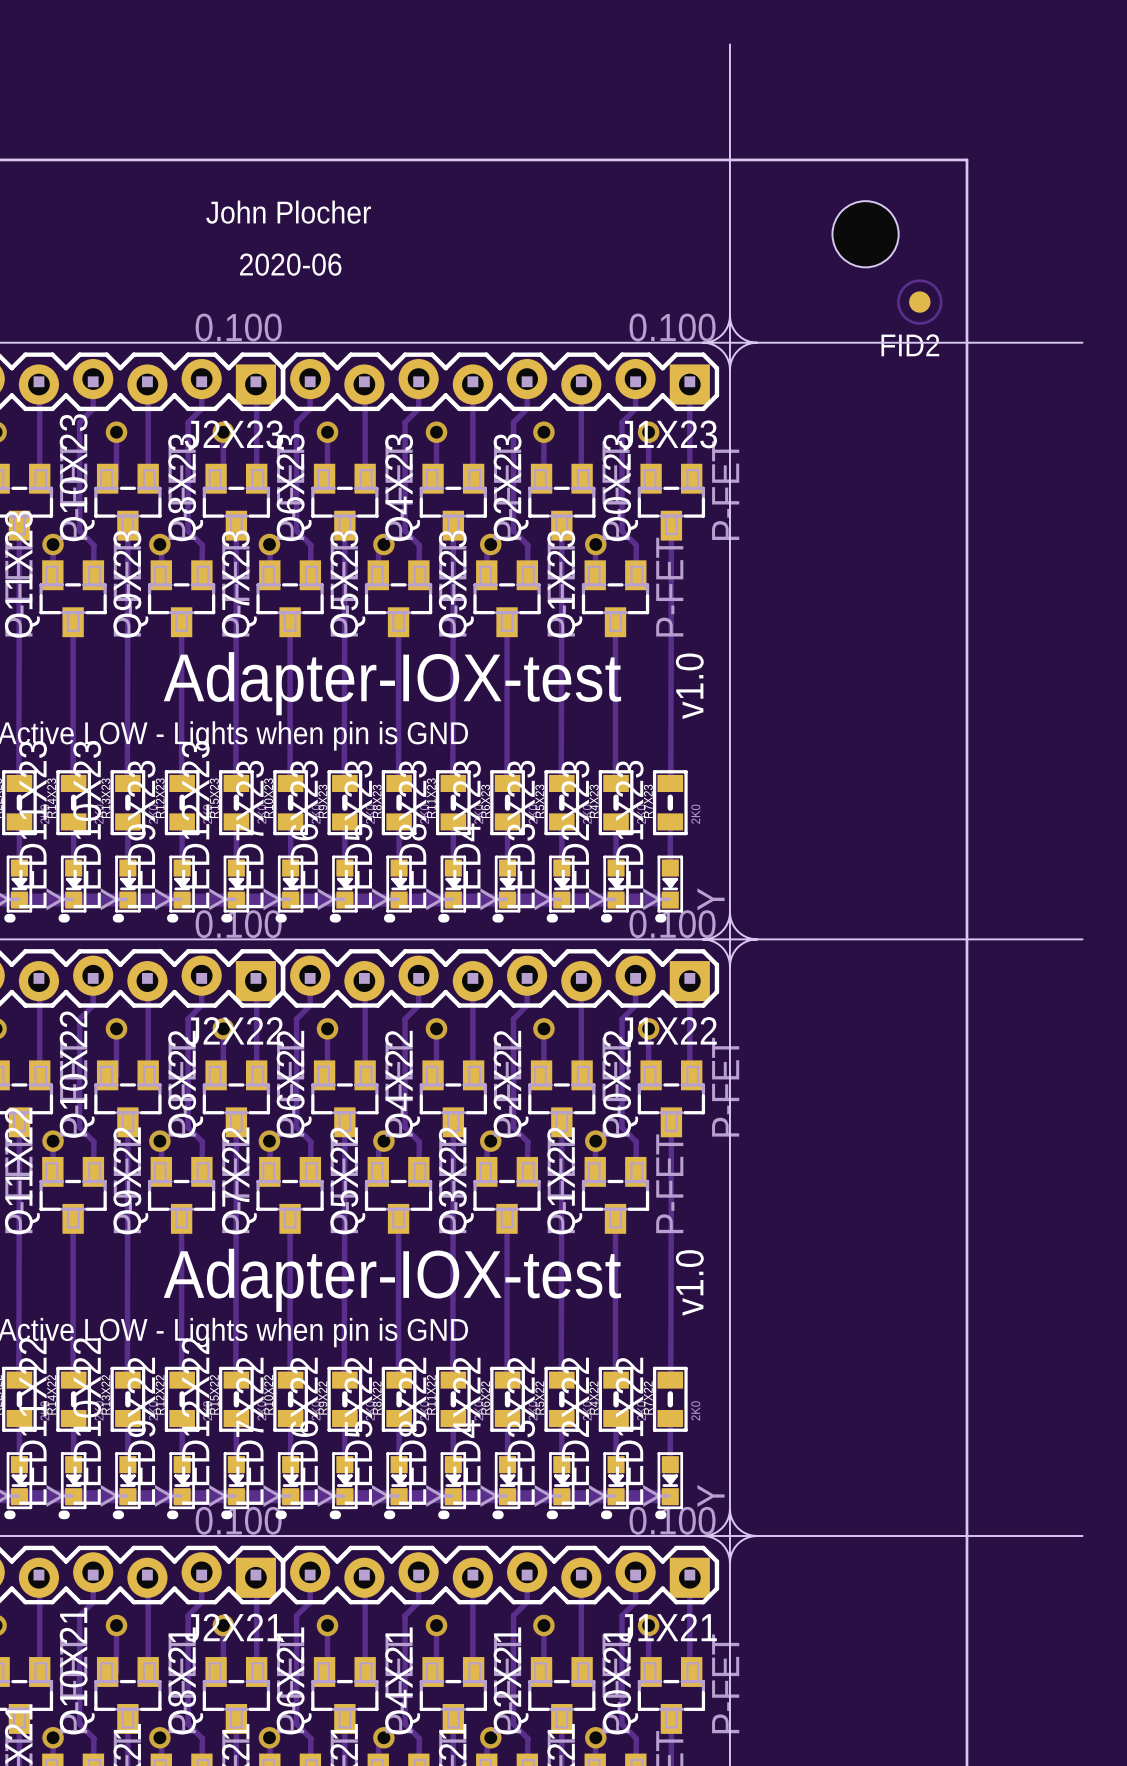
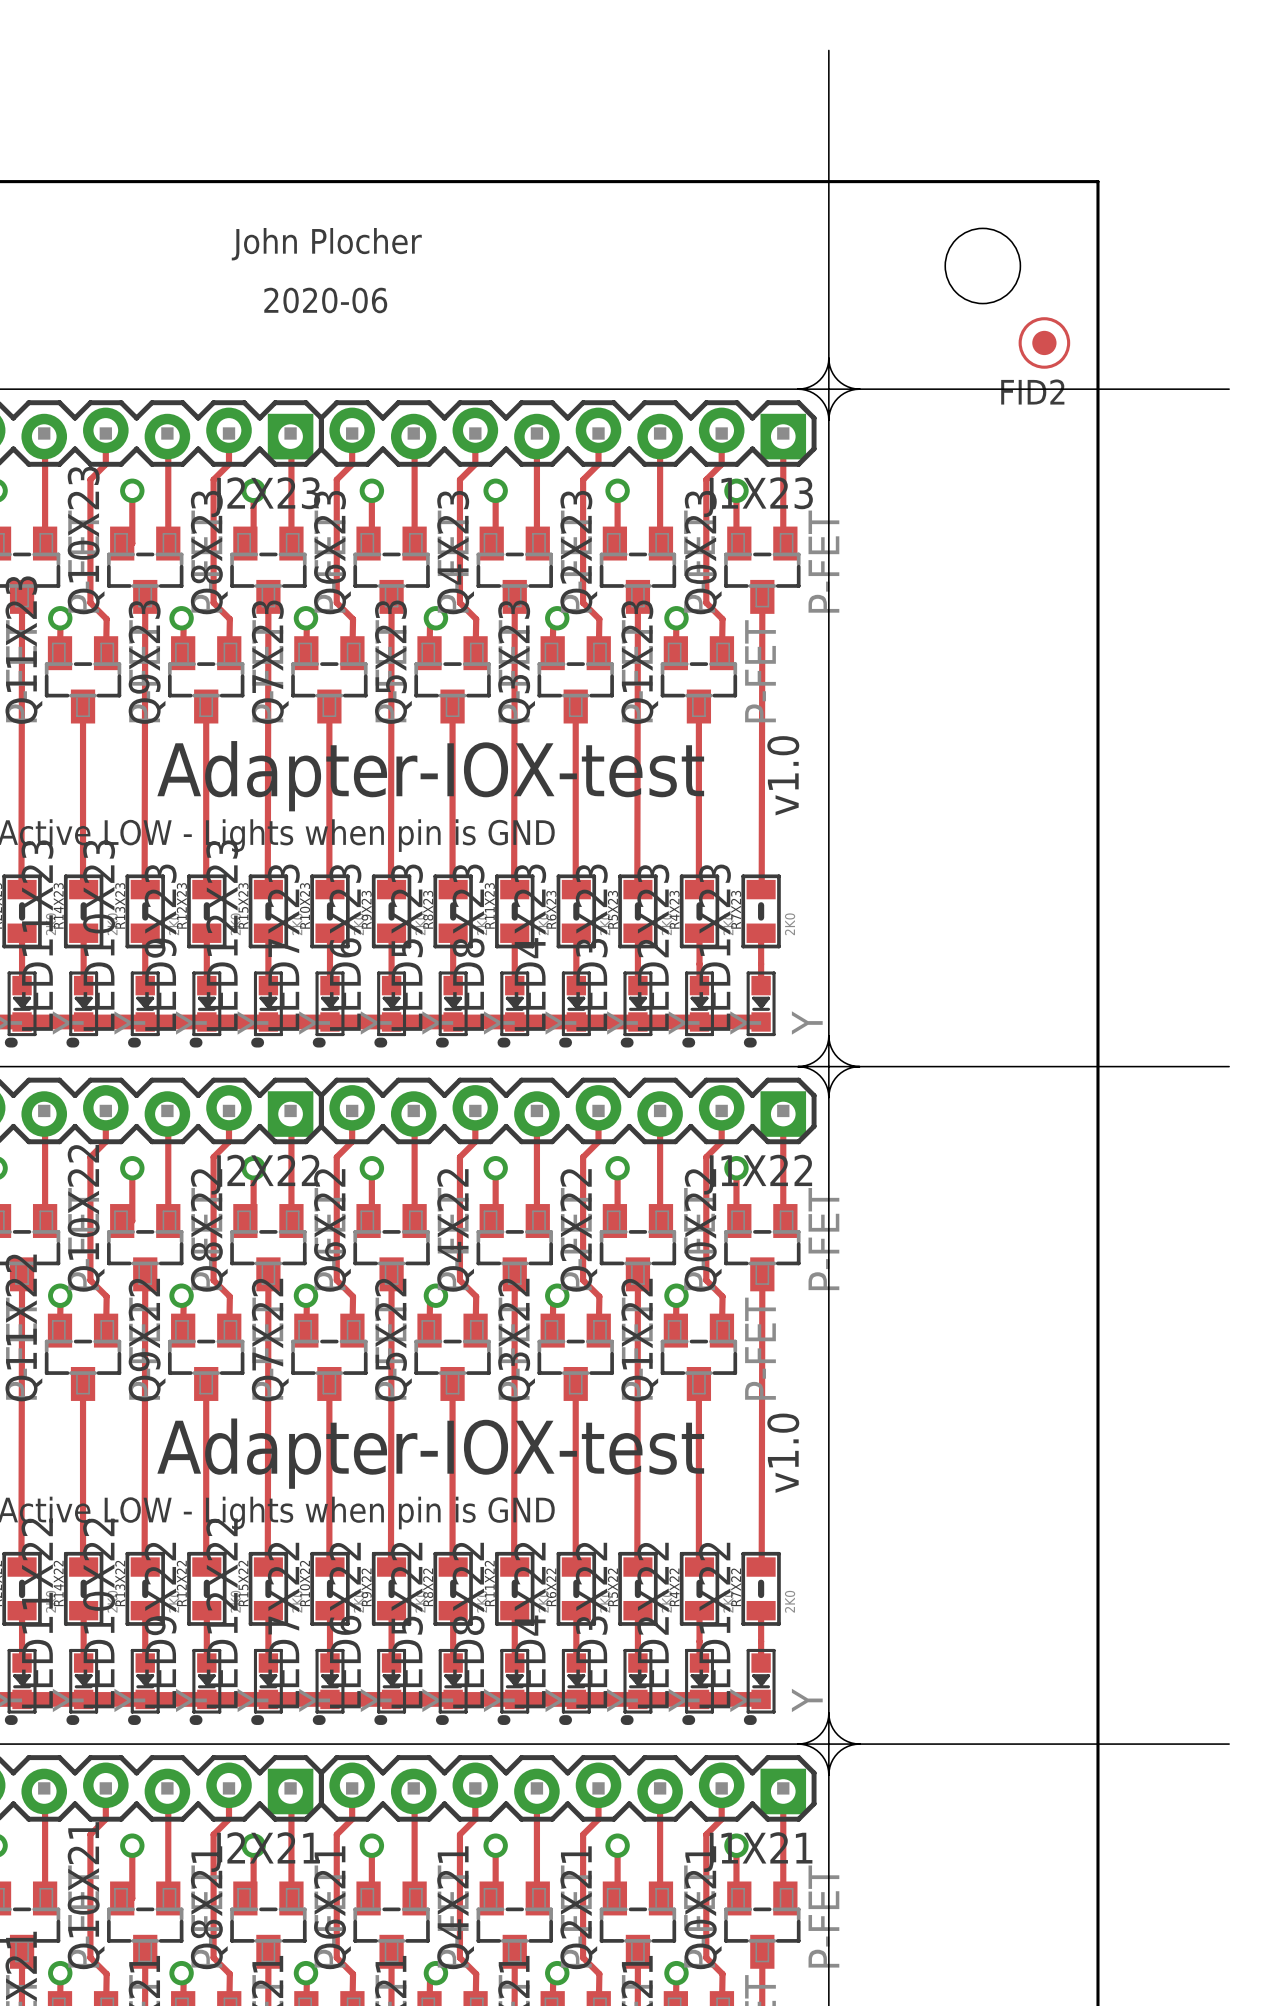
J2X23 value: 0.100 (238, 327) -> none
J1X23 value: 0.100 (672, 327) -> none
J2X22 value: 0.100 (238, 924) -> none
J1X22 value: 0.100 (672, 924) -> none
J2X21 value: 0.100 (238, 1520) -> none
J1X21 value: 0.100 (672, 1520) -> none

